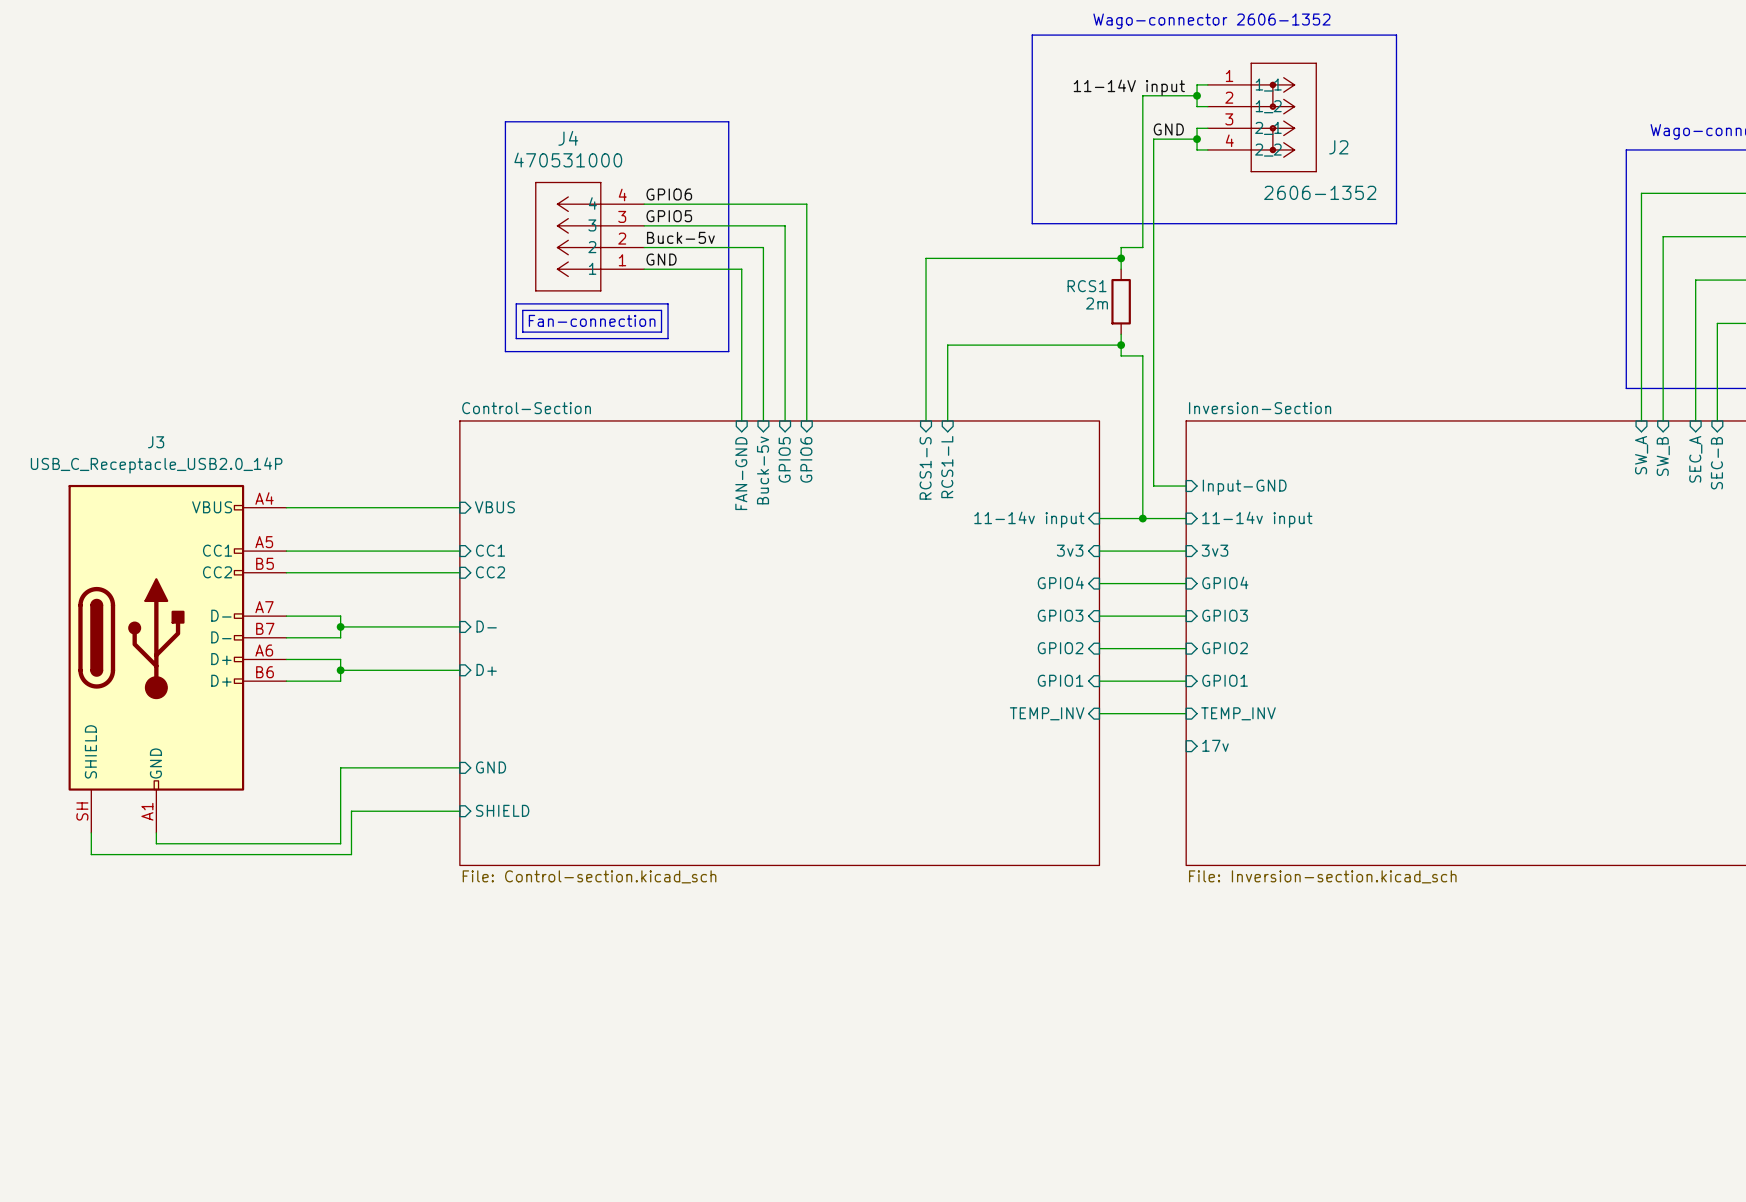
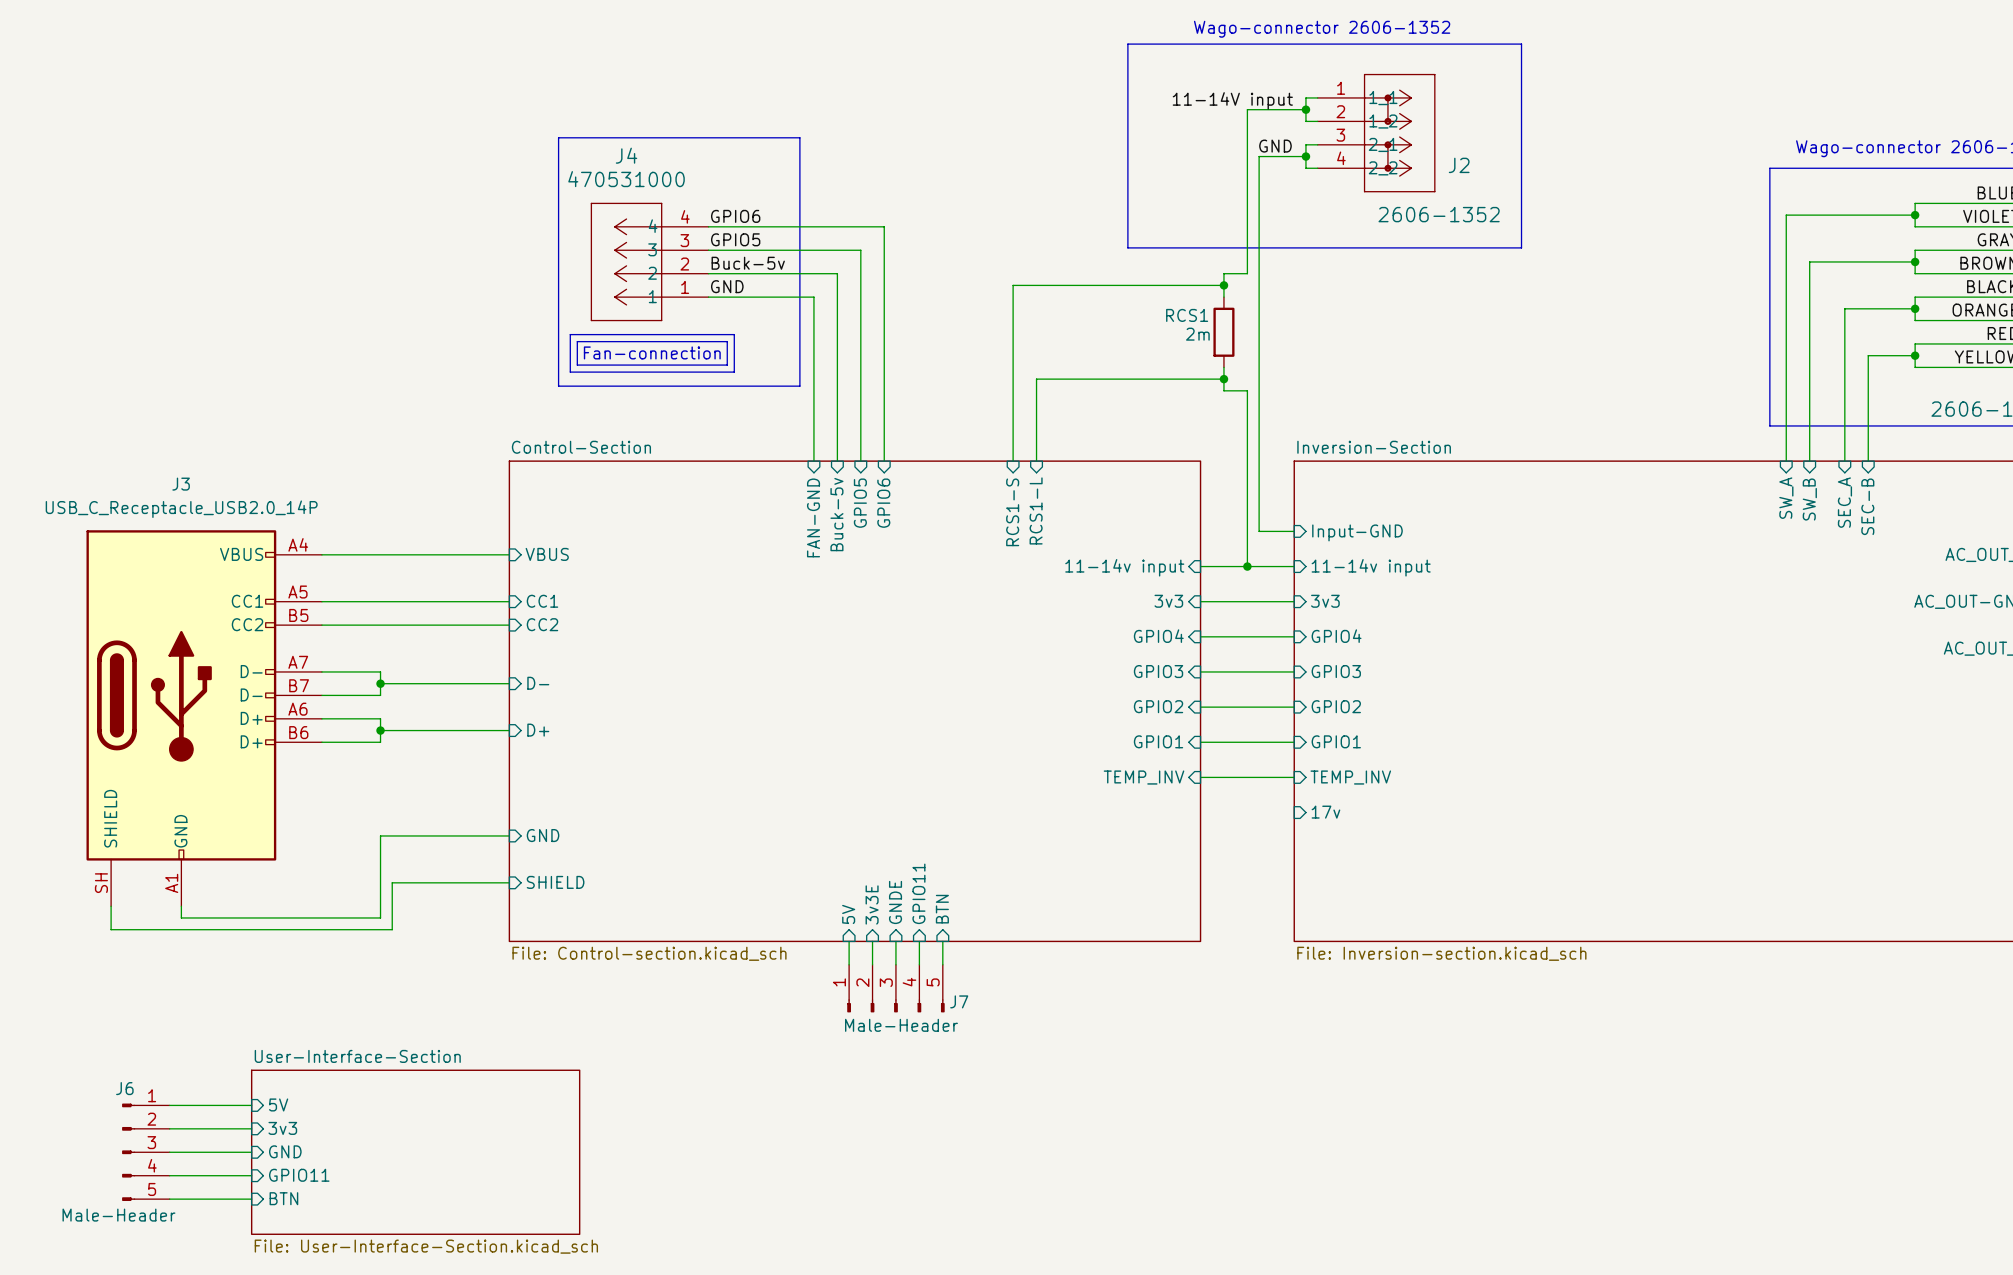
sheet pin: none -> GPIO11 (918, 893)
sheet pin: none -> GNDE (895, 902)
sheet pin: none -> 3v3E (872, 904)
sheet pin: none -> BTN (942, 909)
sheet pin: none -> 5V (848, 914)
wire: none -> (849, 941) (849, 964)
wire: none -> (872, 941) (872, 964)
wire: none -> (895, 941) (895, 964)
wire: none -> (919, 941) (919, 964)
wire: none -> (942, 941) (942, 964)
J7: none -> Male-Header (895, 988)
sheet pin: none -> 5V (278, 1104)
wire: none -> (169, 1105) (251, 1105)
wire: none -> (169, 1128) (251, 1128)
sheet pin: none -> 3v3 (282, 1128)
J6: none -> Male-Header (145, 1152)
wire: none -> (169, 1152) (251, 1152)
sheet pin: none -> GND (285, 1151)
sheet User-Interface-Section: none -> File: User-Interface-Section.kicad_sch (415, 1152)
sheet pin: none -> GPIO11 (299, 1175)
wire: none -> (169, 1175) (251, 1175)
wire: none -> (169, 1199) (251, 1199)
sheet pin: none -> BTN (283, 1198)

